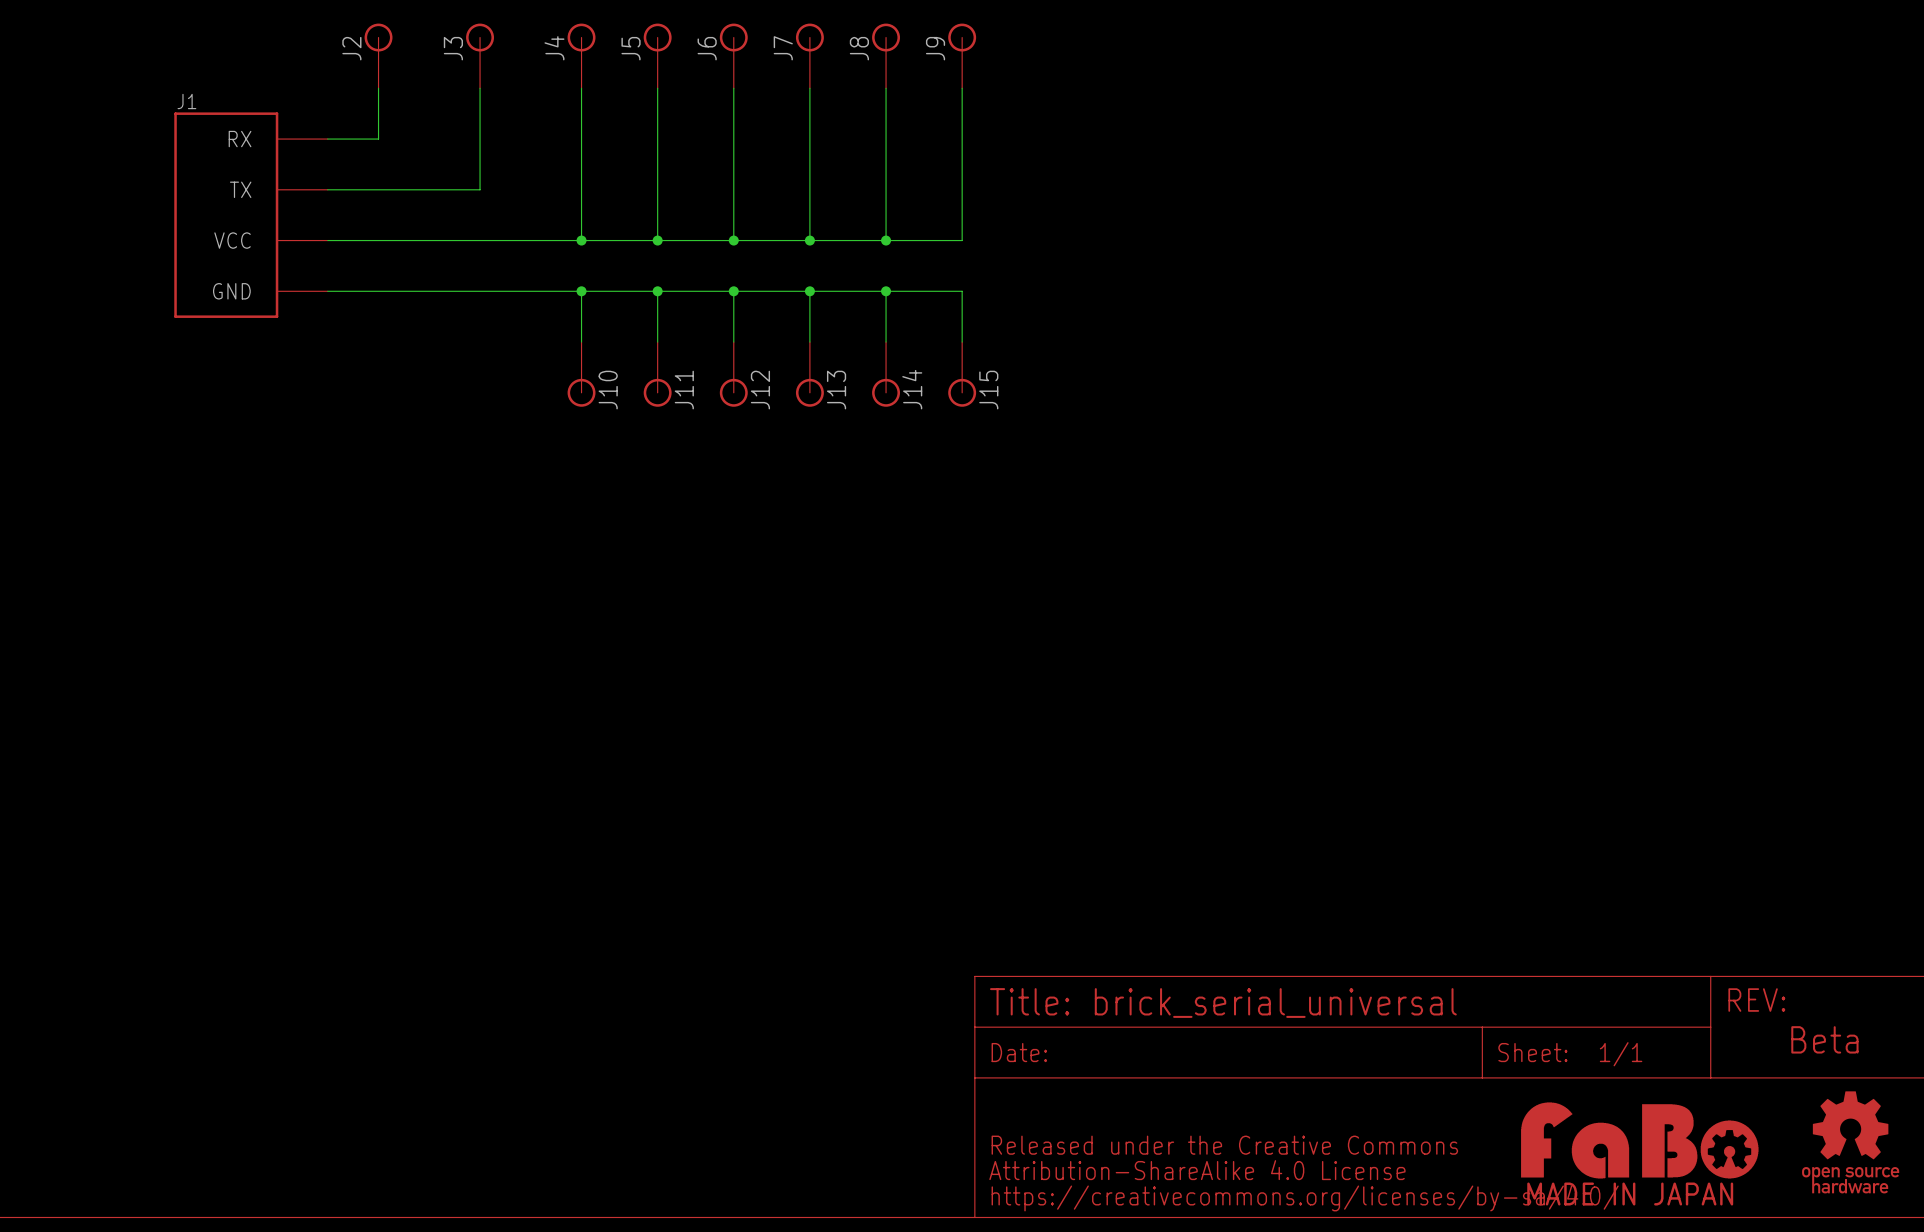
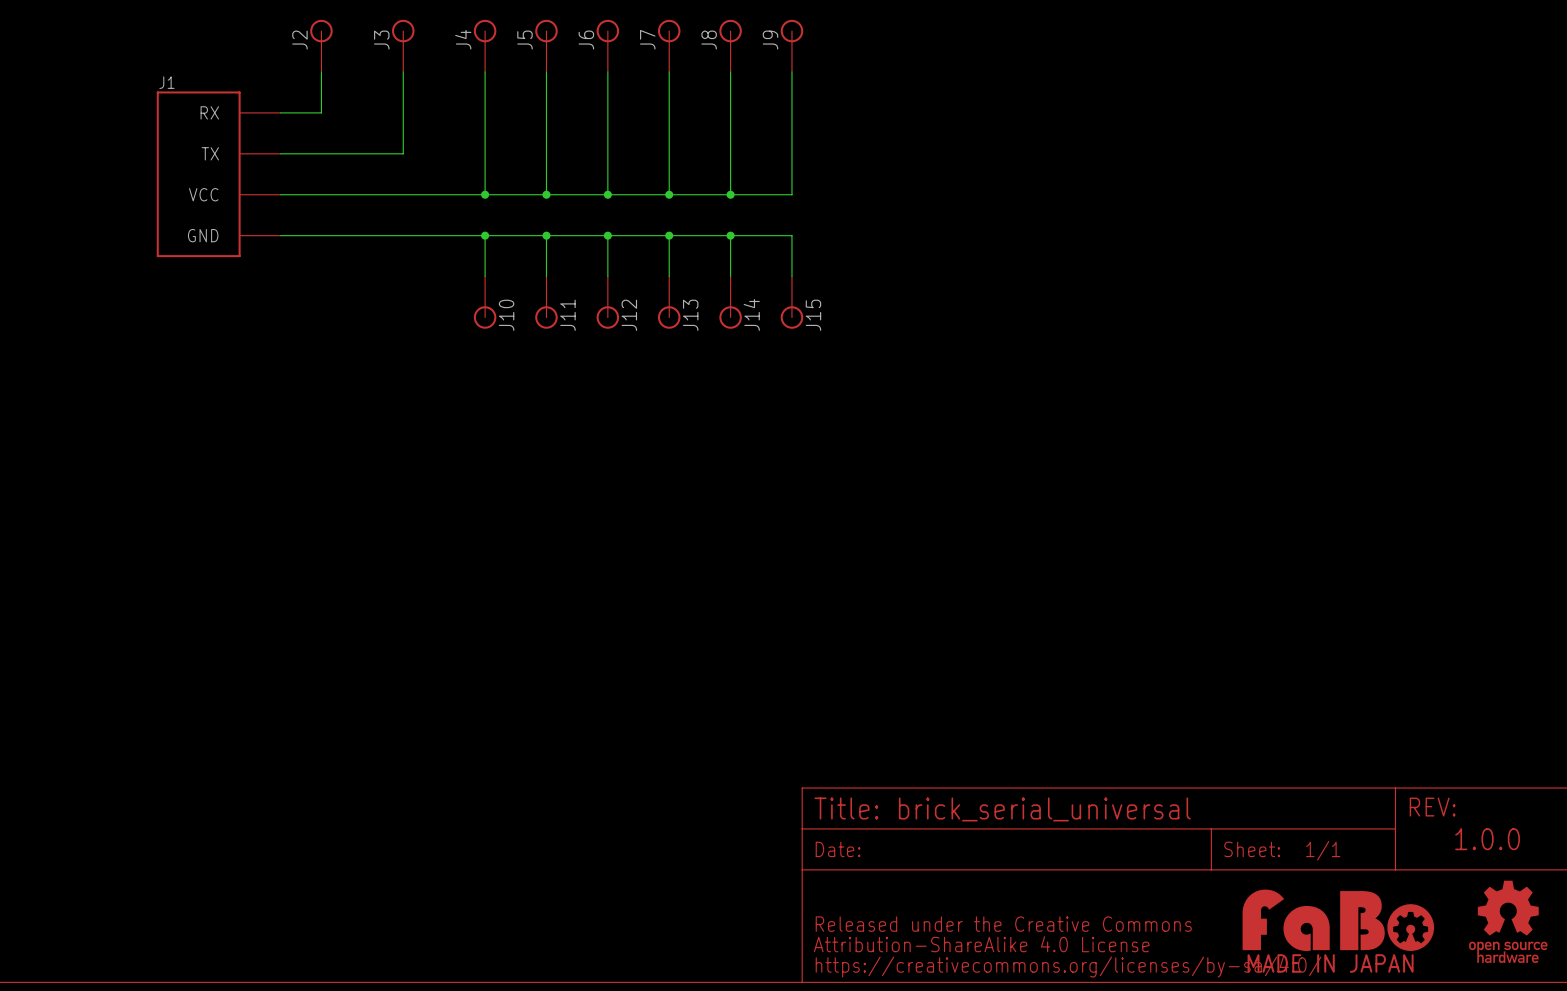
text: Beta (1824, 1039) -> 1.0.0 (1487, 839)

